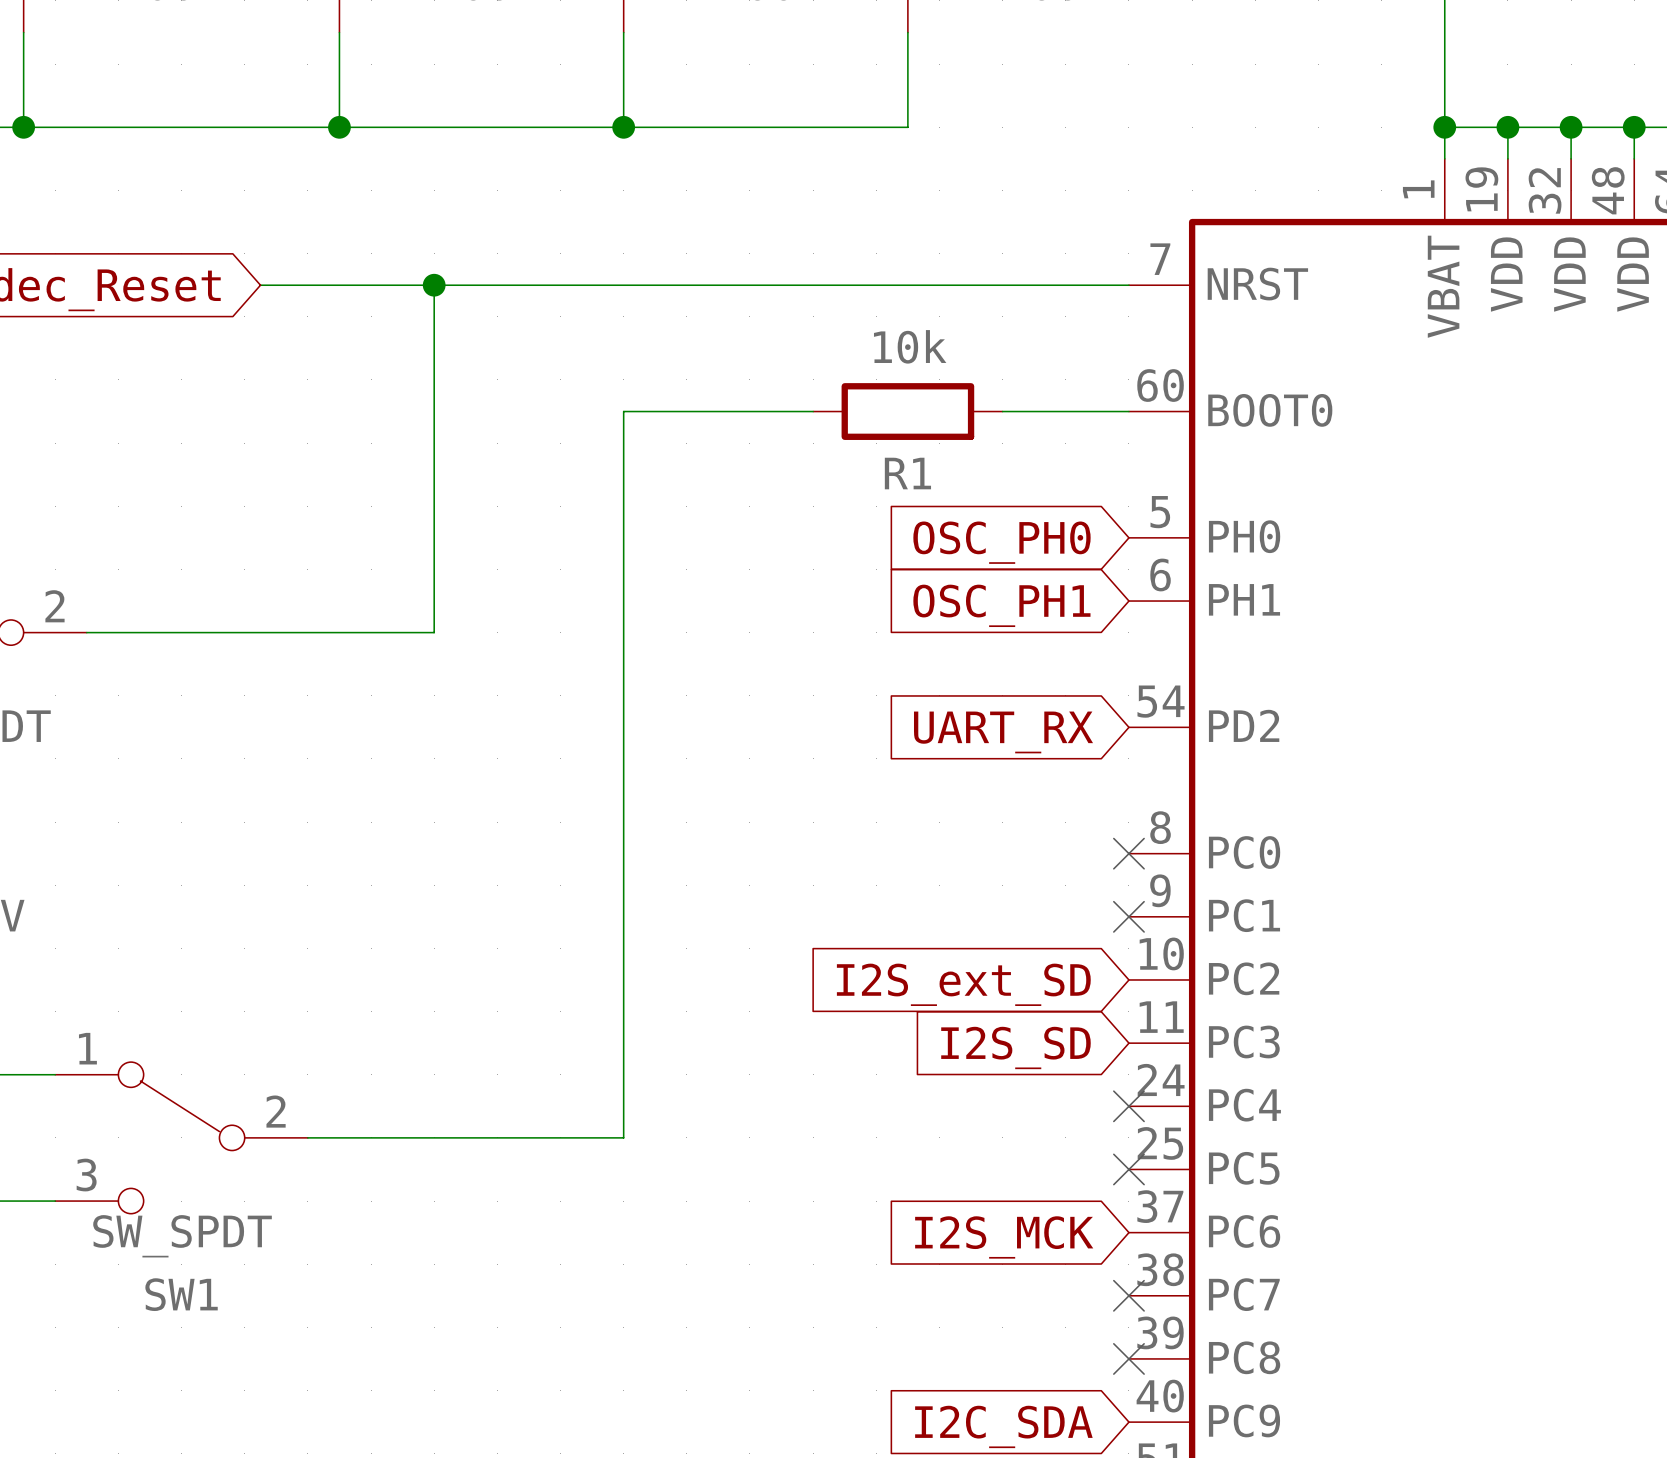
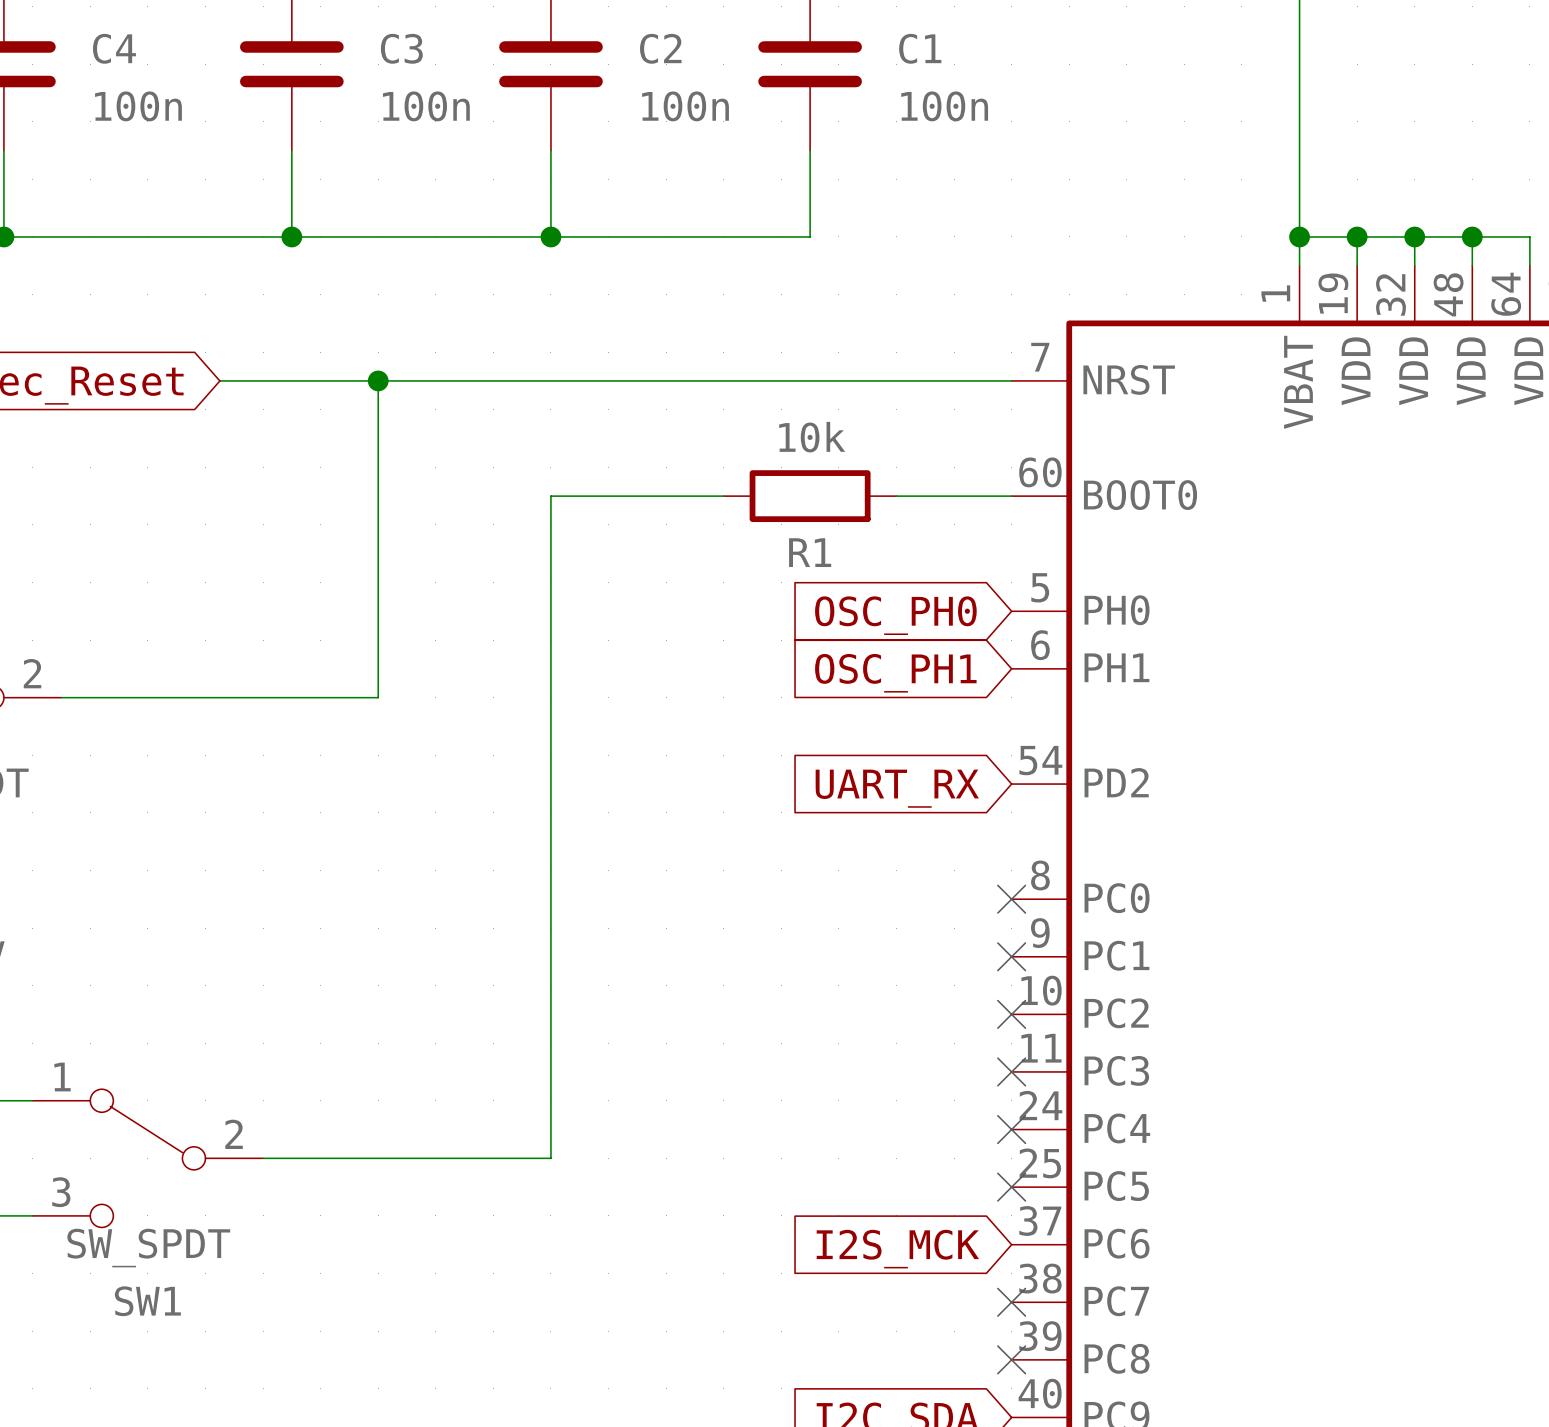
no-connect mark: none -> (1011, 1014)
global label: I2S_ext_SD (963, 984) -> none
no-connect mark: none -> (1011, 1071)
global label: I2S_SD (1015, 1047) -> none

